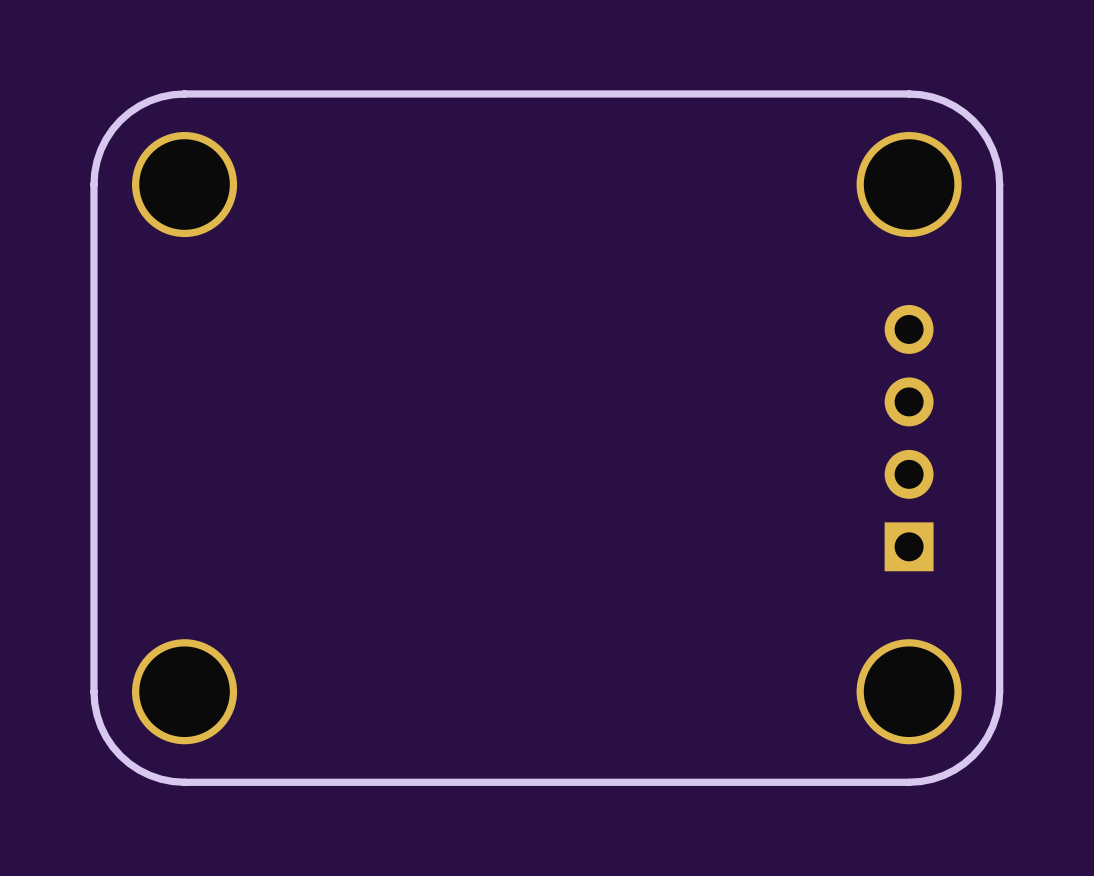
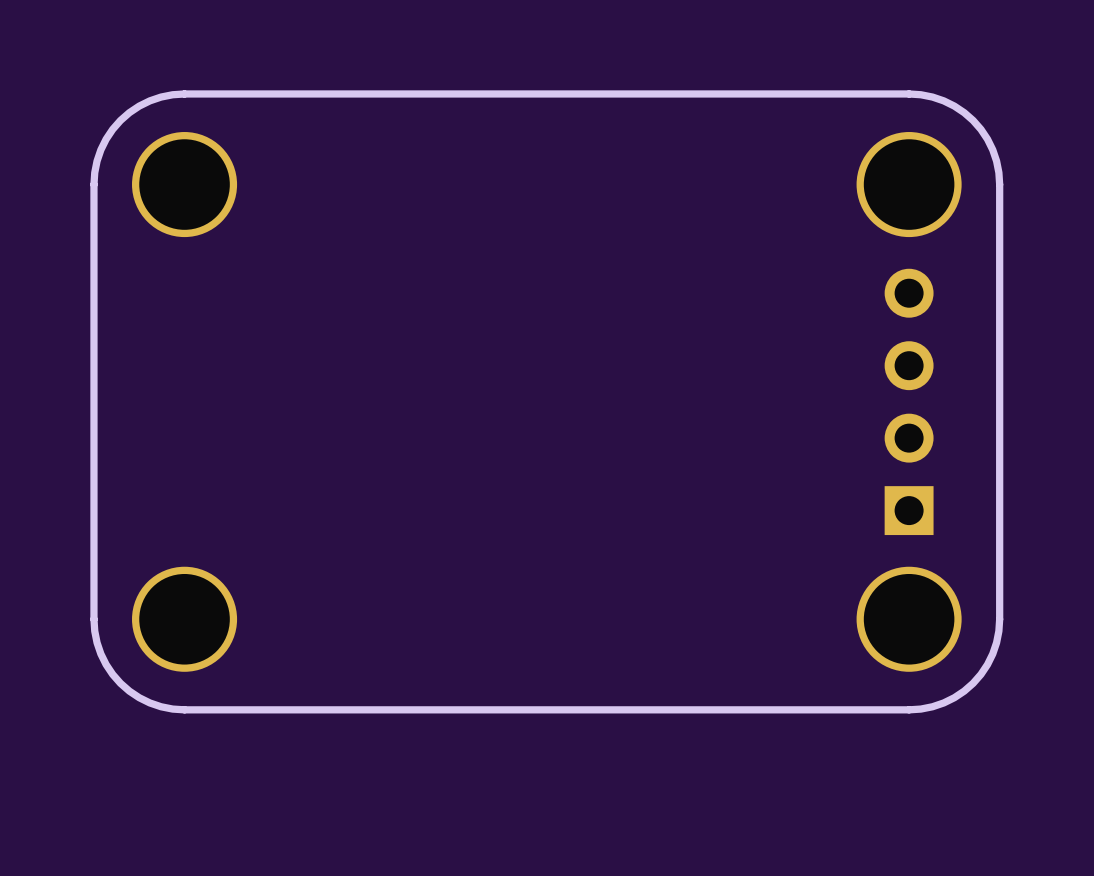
part position: (909, 438) -> (909, 401)
board edge: (999, 619) (998, 703) (996, 715) (987, 737) (973, 755) (954, 770) (932, 779) (909, 782) (184, 782) (161, 779) (149, 775) (129, 763) (112, 746) (100, 726) (94, 703) (93, 691) (93, 619) -> (999, 619) (998, 631) (992, 653) (987, 664) (973, 683) (964, 691) (943, 702) (920, 709) (909, 709) (172, 709) (149, 702) (139, 697) (129, 691) (112, 674) (106, 664) (97, 642) (93, 619)
part position: (184, 691) -> (184, 619)
part position: (909, 691) -> (909, 619)

